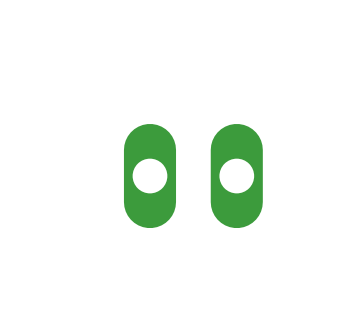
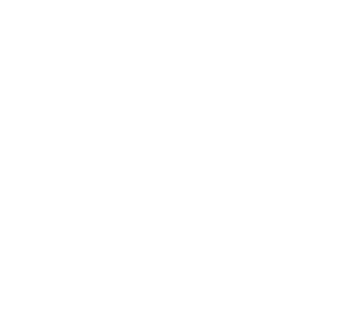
part: (193, 176) -> none

